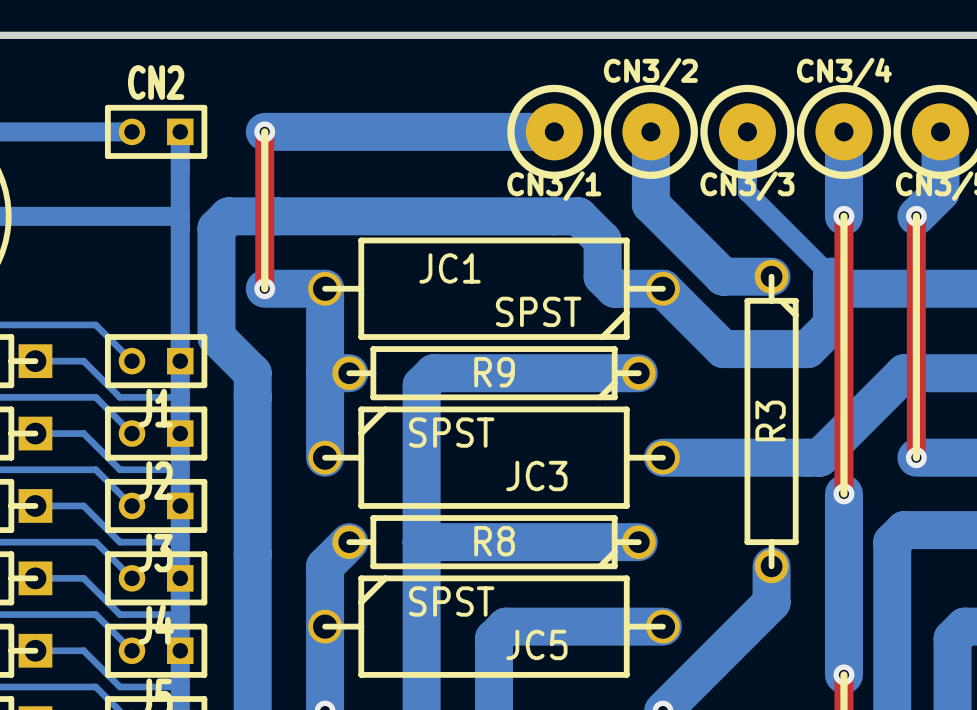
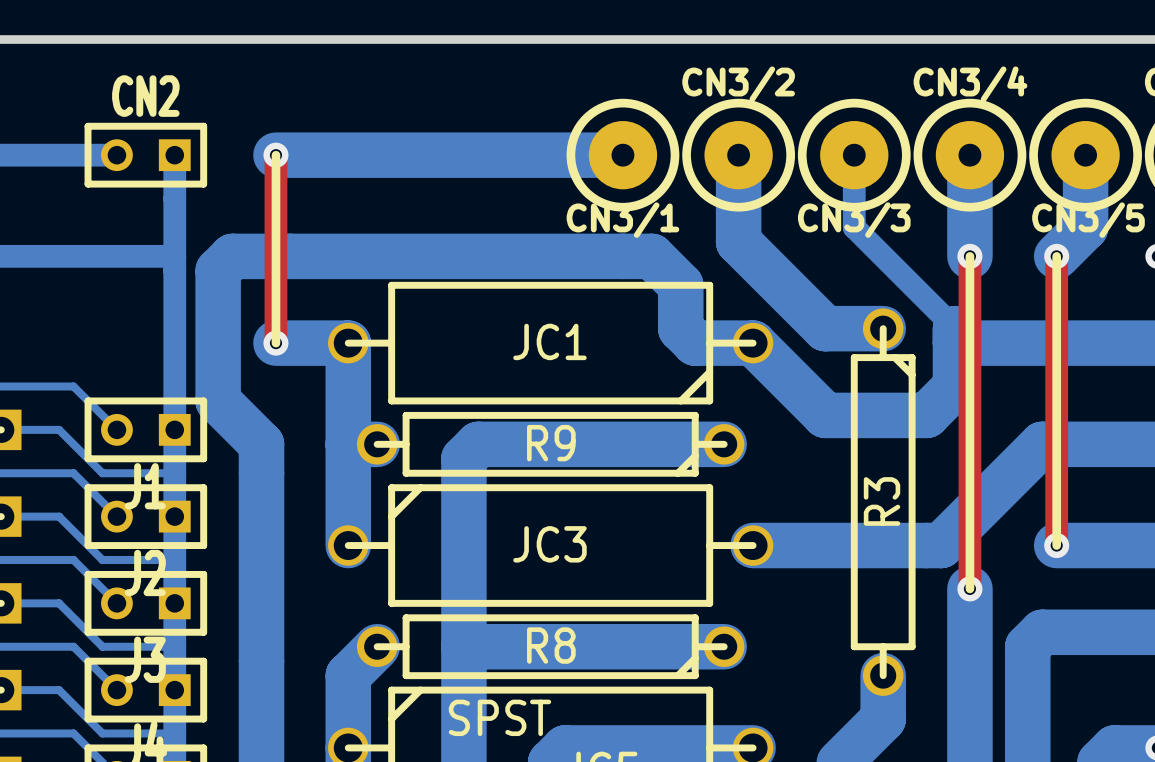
JC1 name position: JC1 (450, 268) -> JC1 (549, 341)
JC1 value: SPST (538, 311) -> none
JC3 value: SPST (451, 432) -> none
JC3 name position: JC3 (536, 476) -> JC3 (549, 544)

